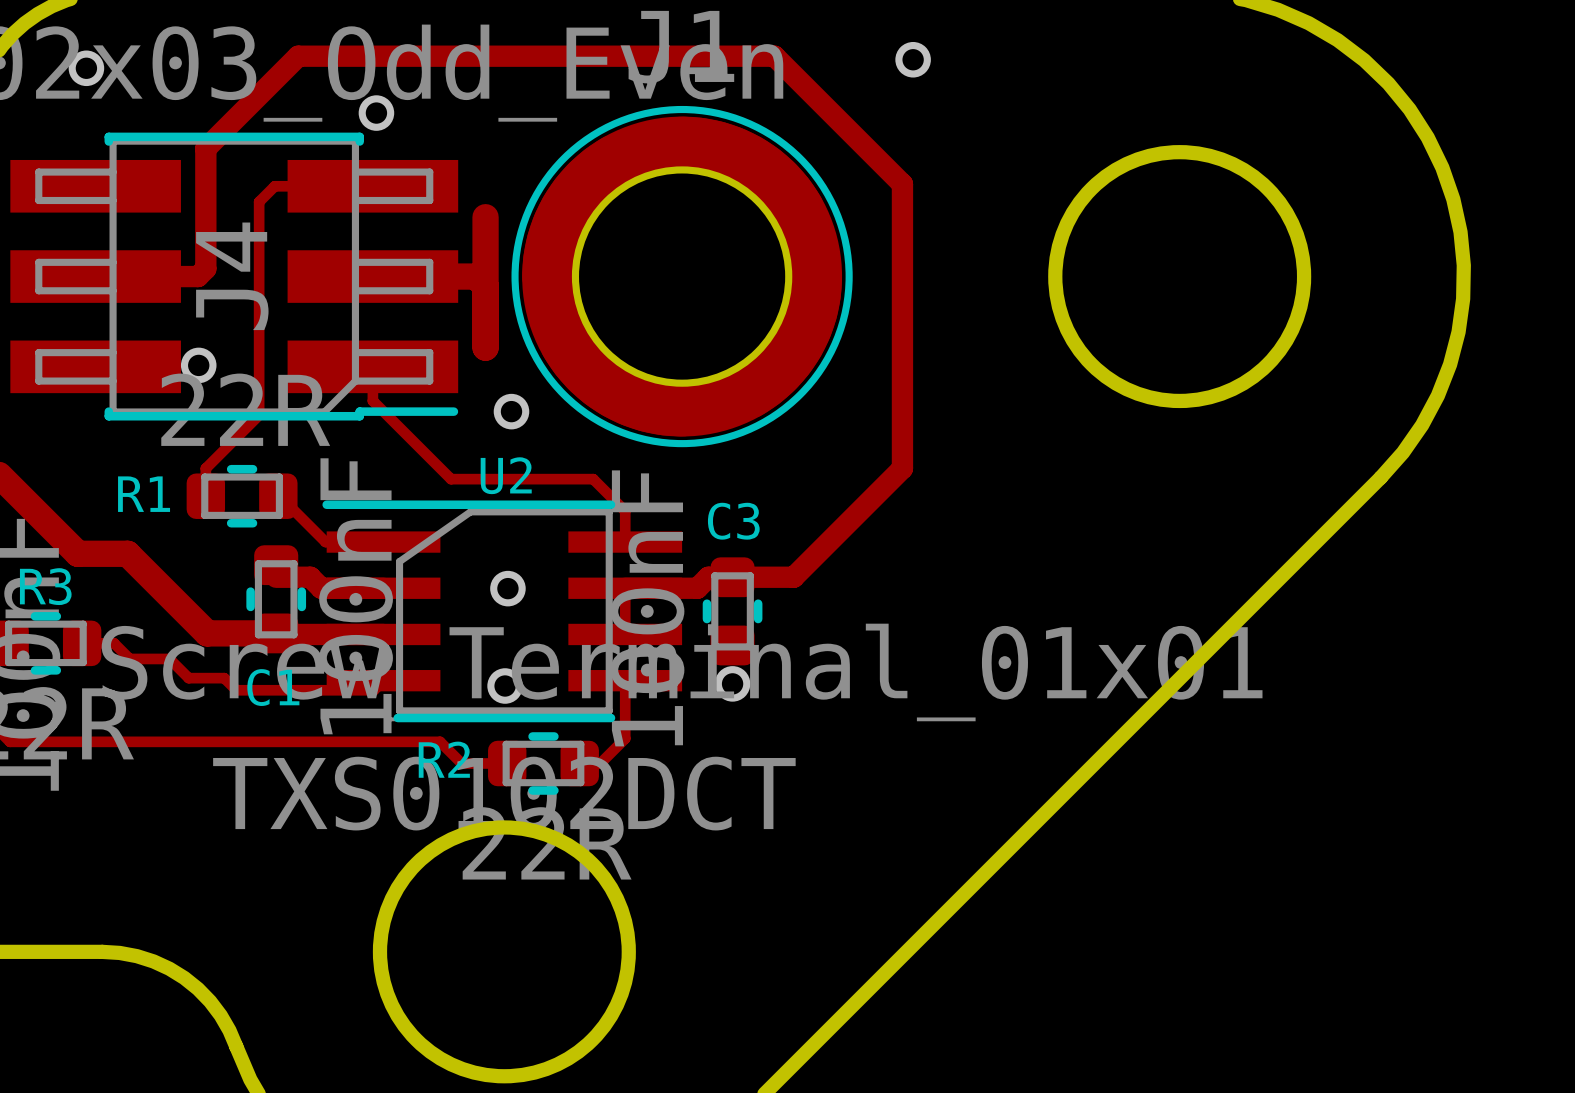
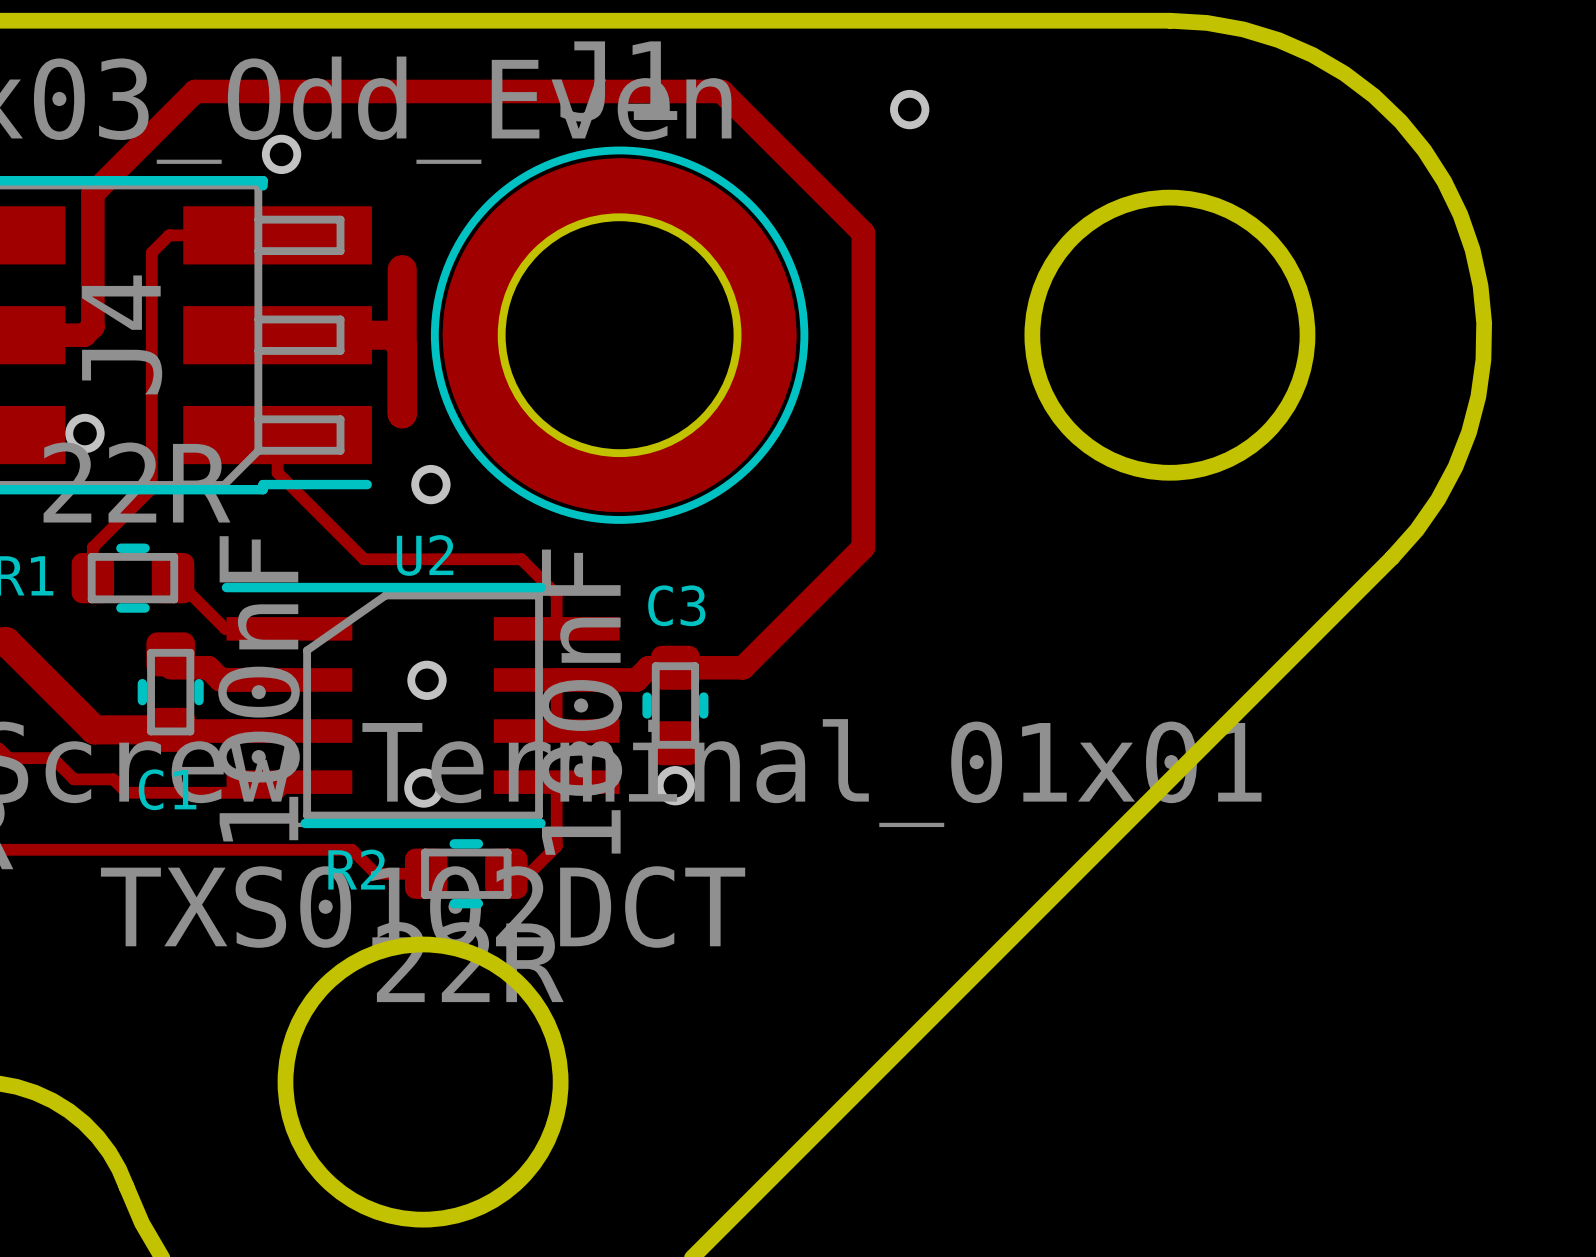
via position: (913, 59) -> (909, 109)

